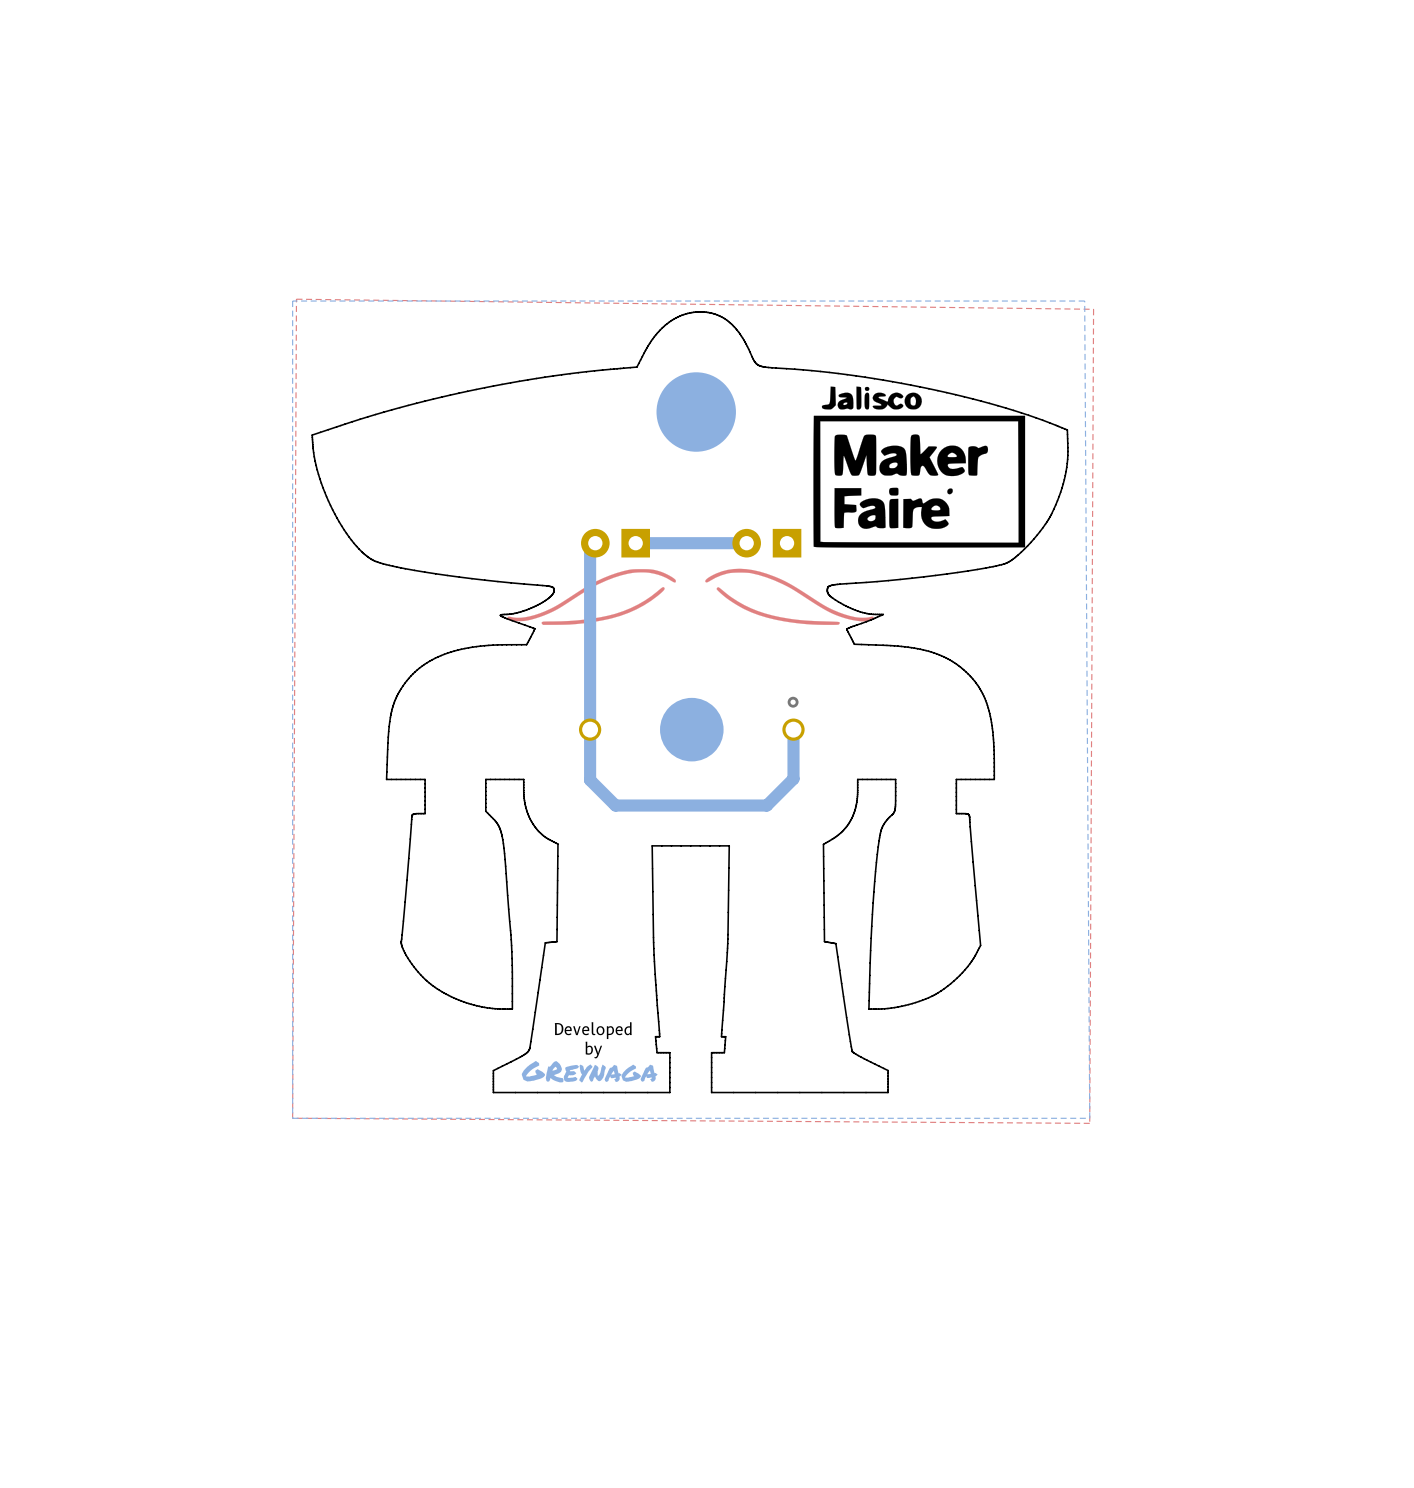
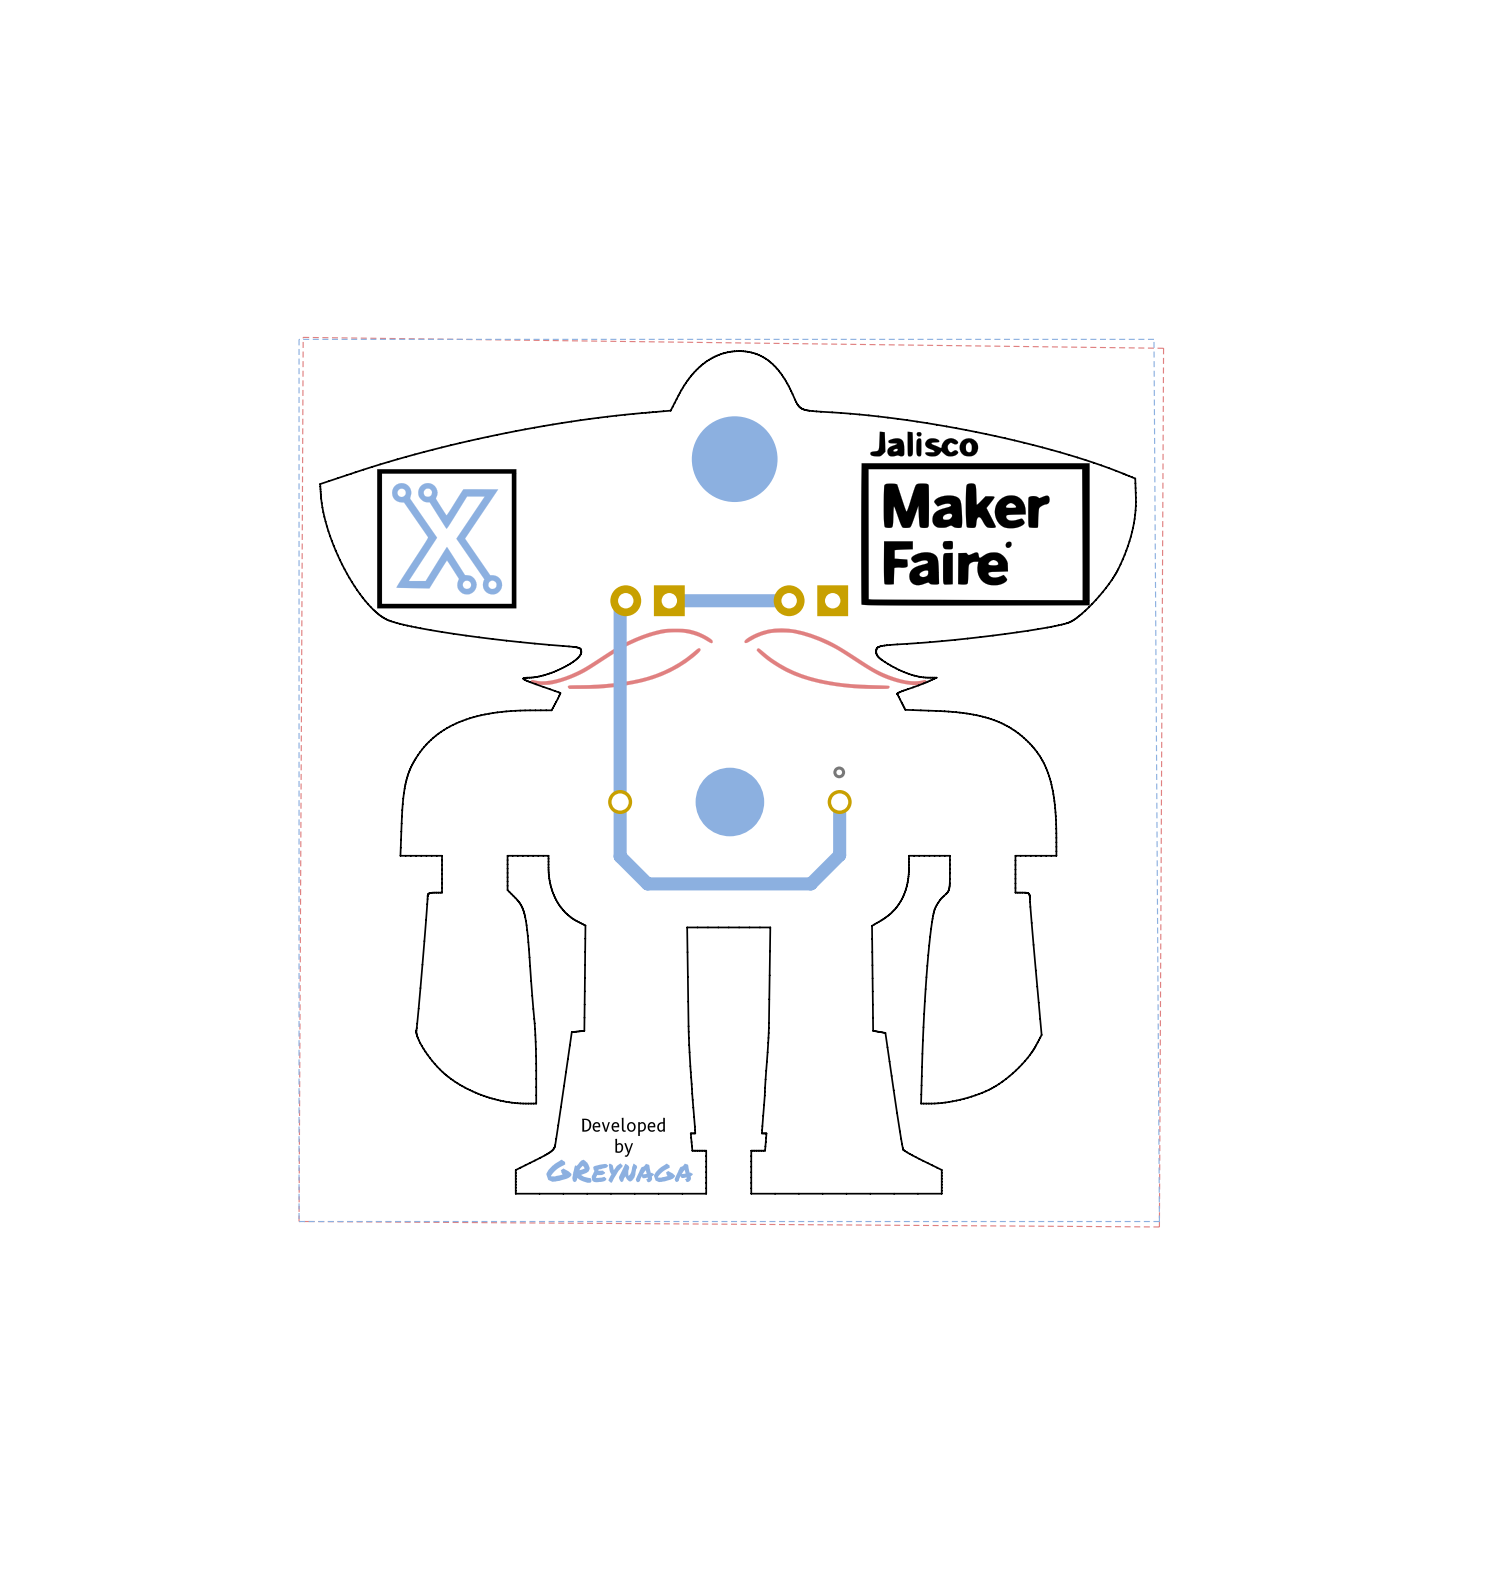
drawing: none -> [377, 469, 517, 609]

